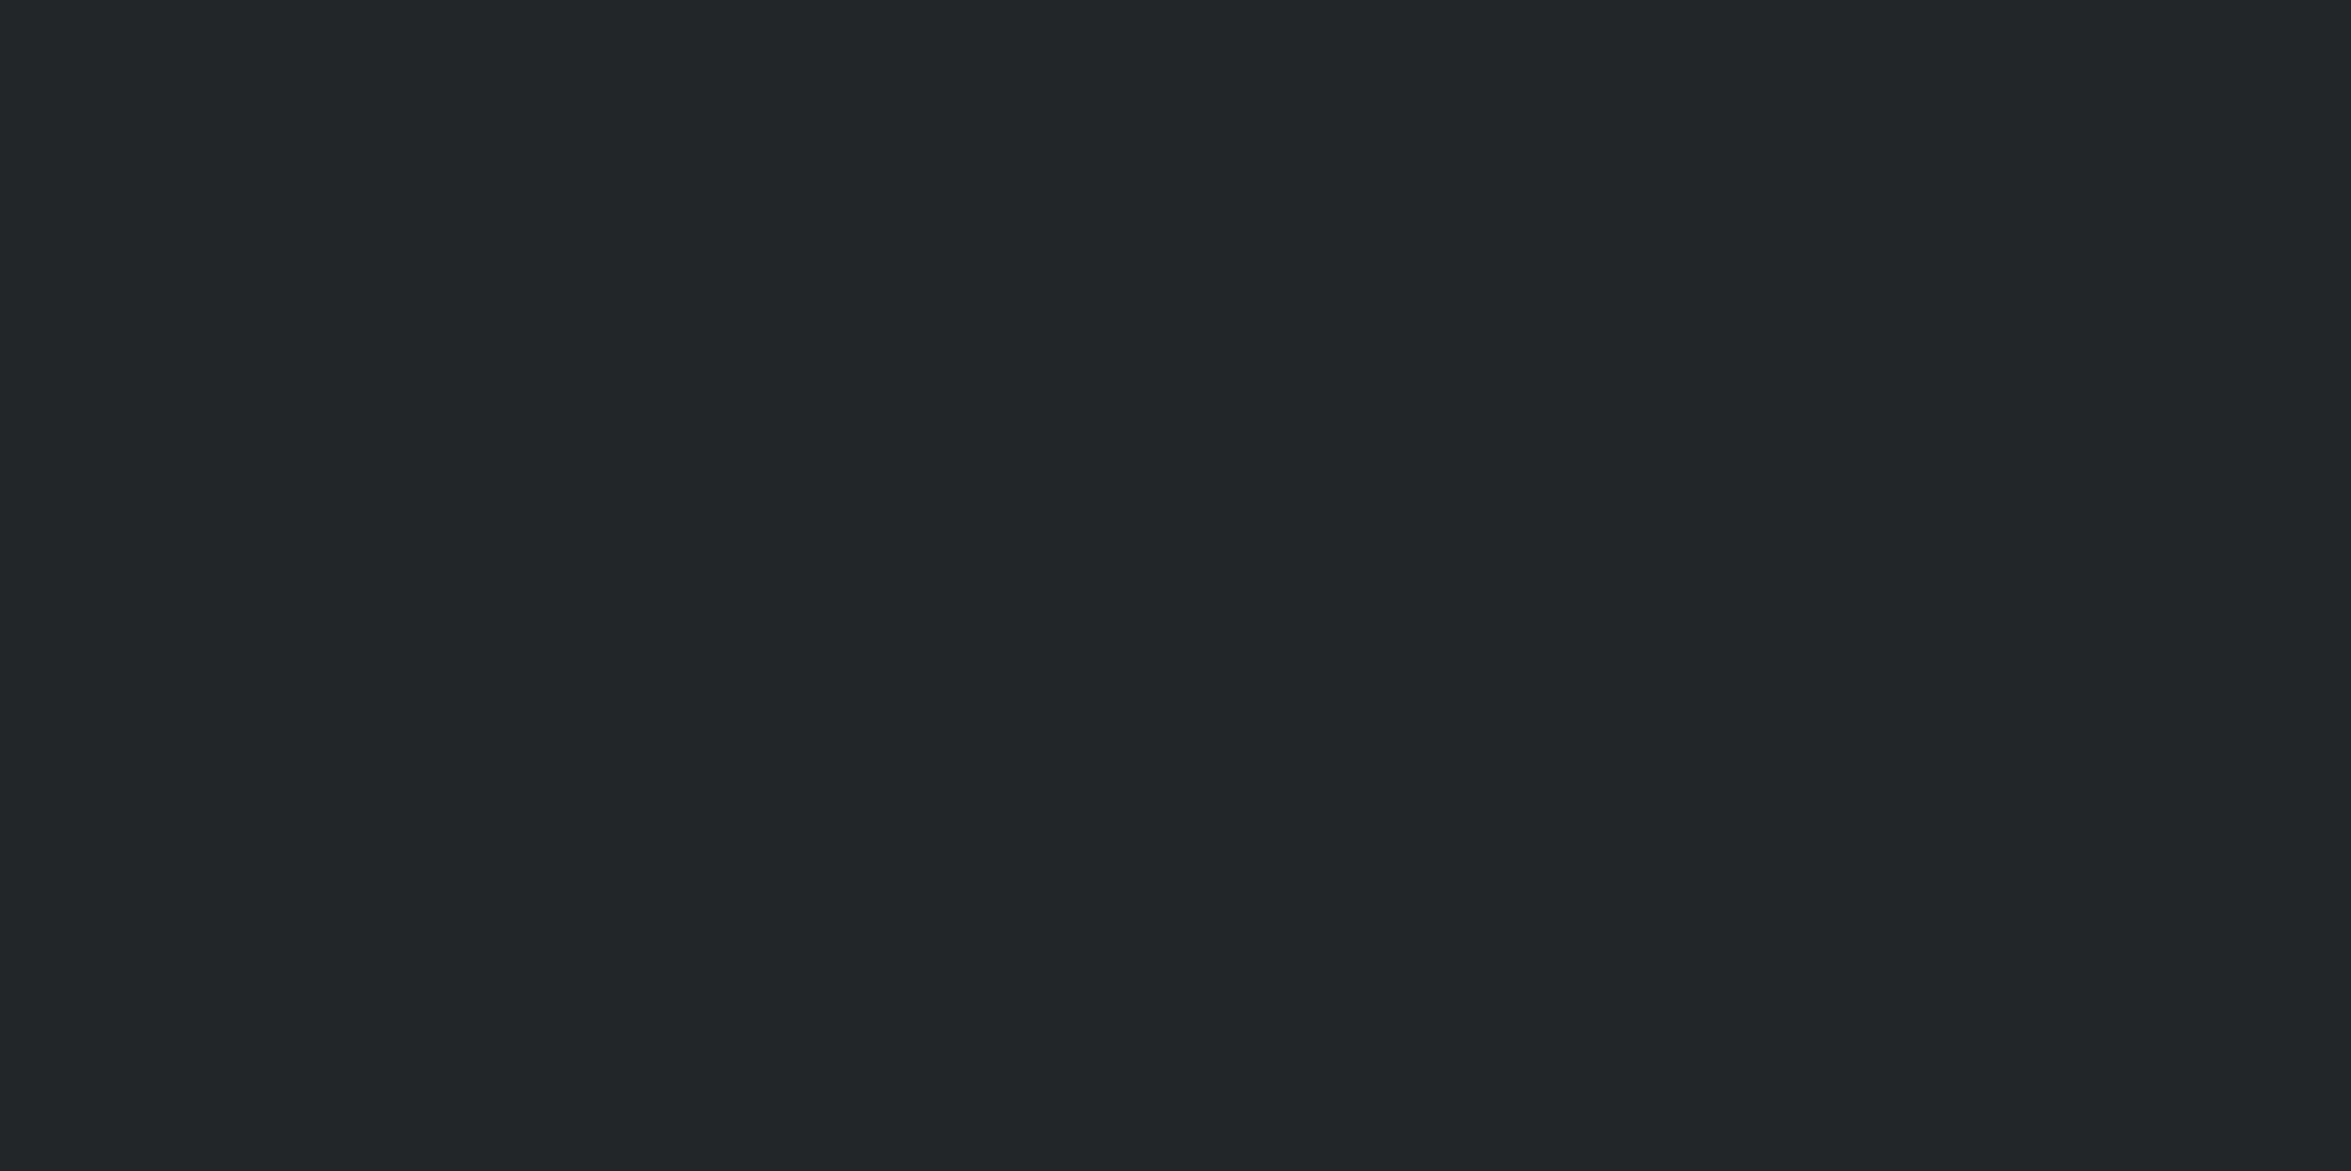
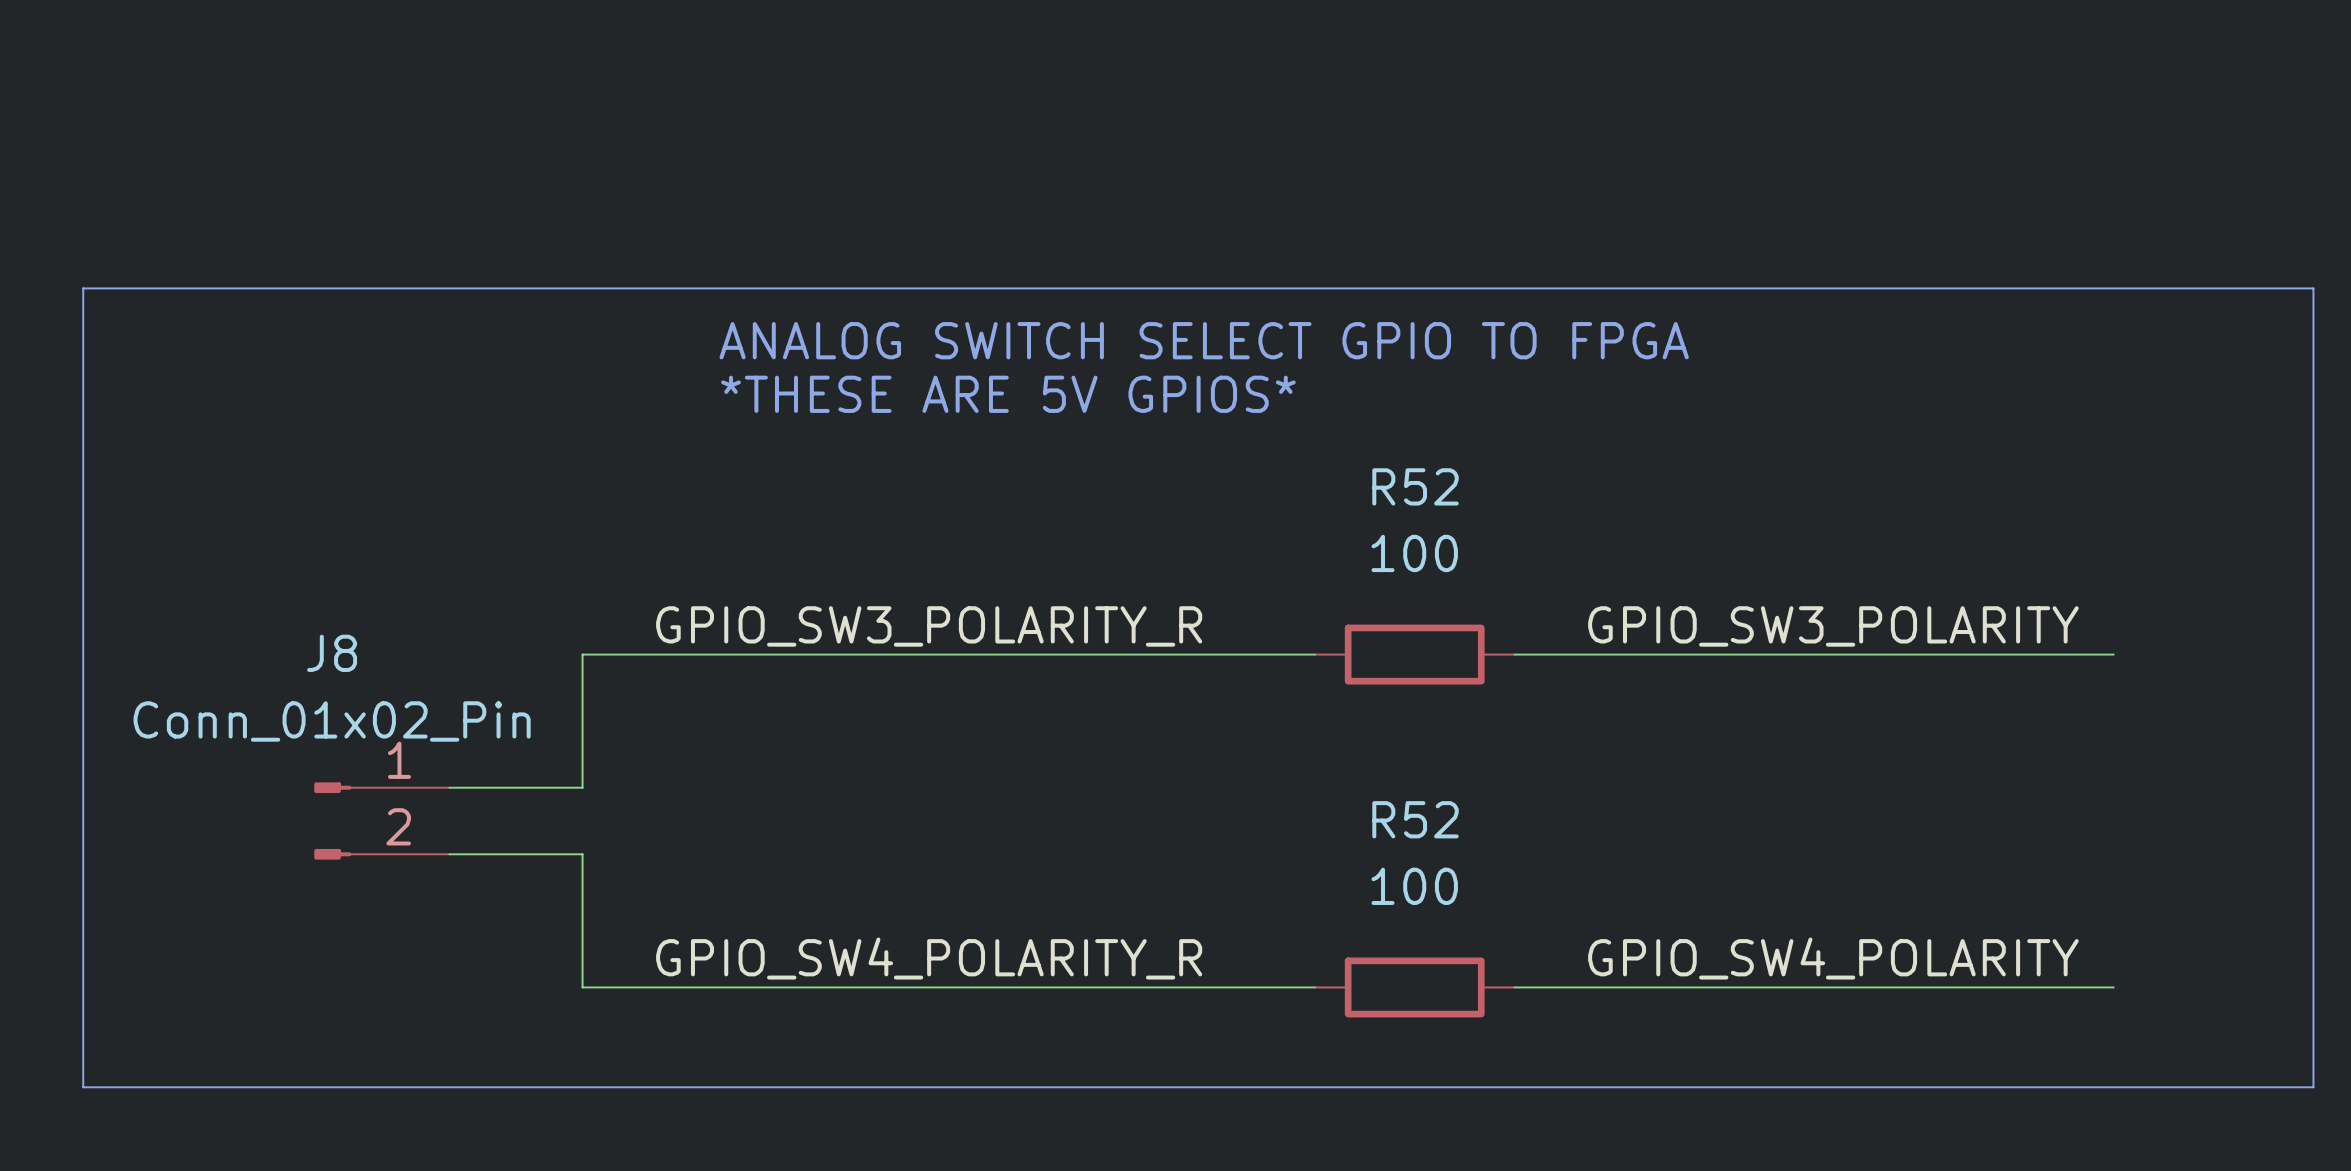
line: none -> (83, 288) (2313, 288) (2313, 1087) (83, 1087) (83, 288)
text: none -> ANALOG SWITCH SELECT GPIO TO FPGA (1204, 340)
text: none -> *THESE ARE 5V GPIOS* (1008, 394)
label: none -> GPIO_SW3_POLARITY_R (929, 626)
label: none -> GPIO_SW3_POLARITY (1833, 626)
wire: none -> (1314, 654) (582, 654) (582, 787) (449, 787)
R52: none -> 100 (1414, 654)
wire: none -> (1514, 654) (2113, 654)
J8: none -> Conn_01x02_Pin (381, 821)
wire: none -> (449, 854) (582, 854) (582, 987) (1314, 987)
label: none -> GPIO_SW4_POLARITY_R (929, 958)
label: none -> GPIO_SW4_POLARITY (1833, 958)
R52: none -> 100 (1414, 987)
wire: none -> (1514, 987) (2113, 987)

